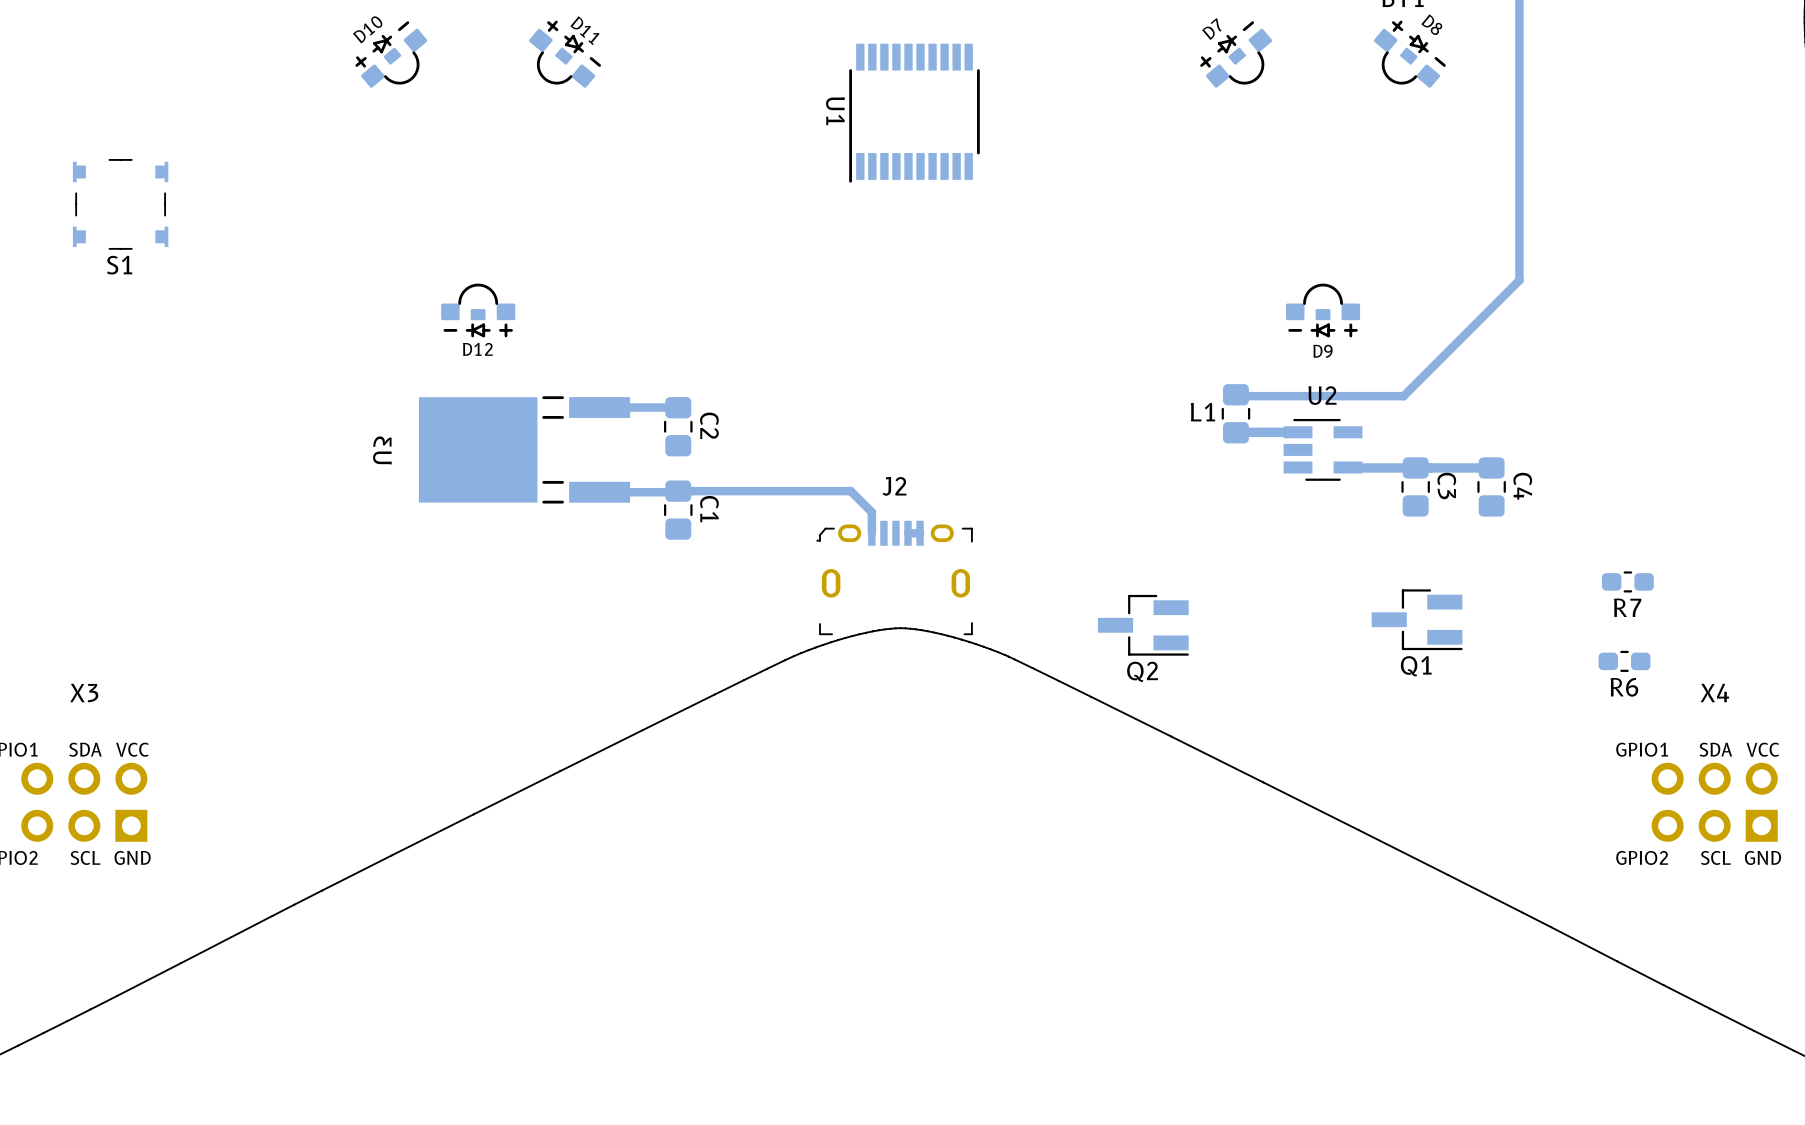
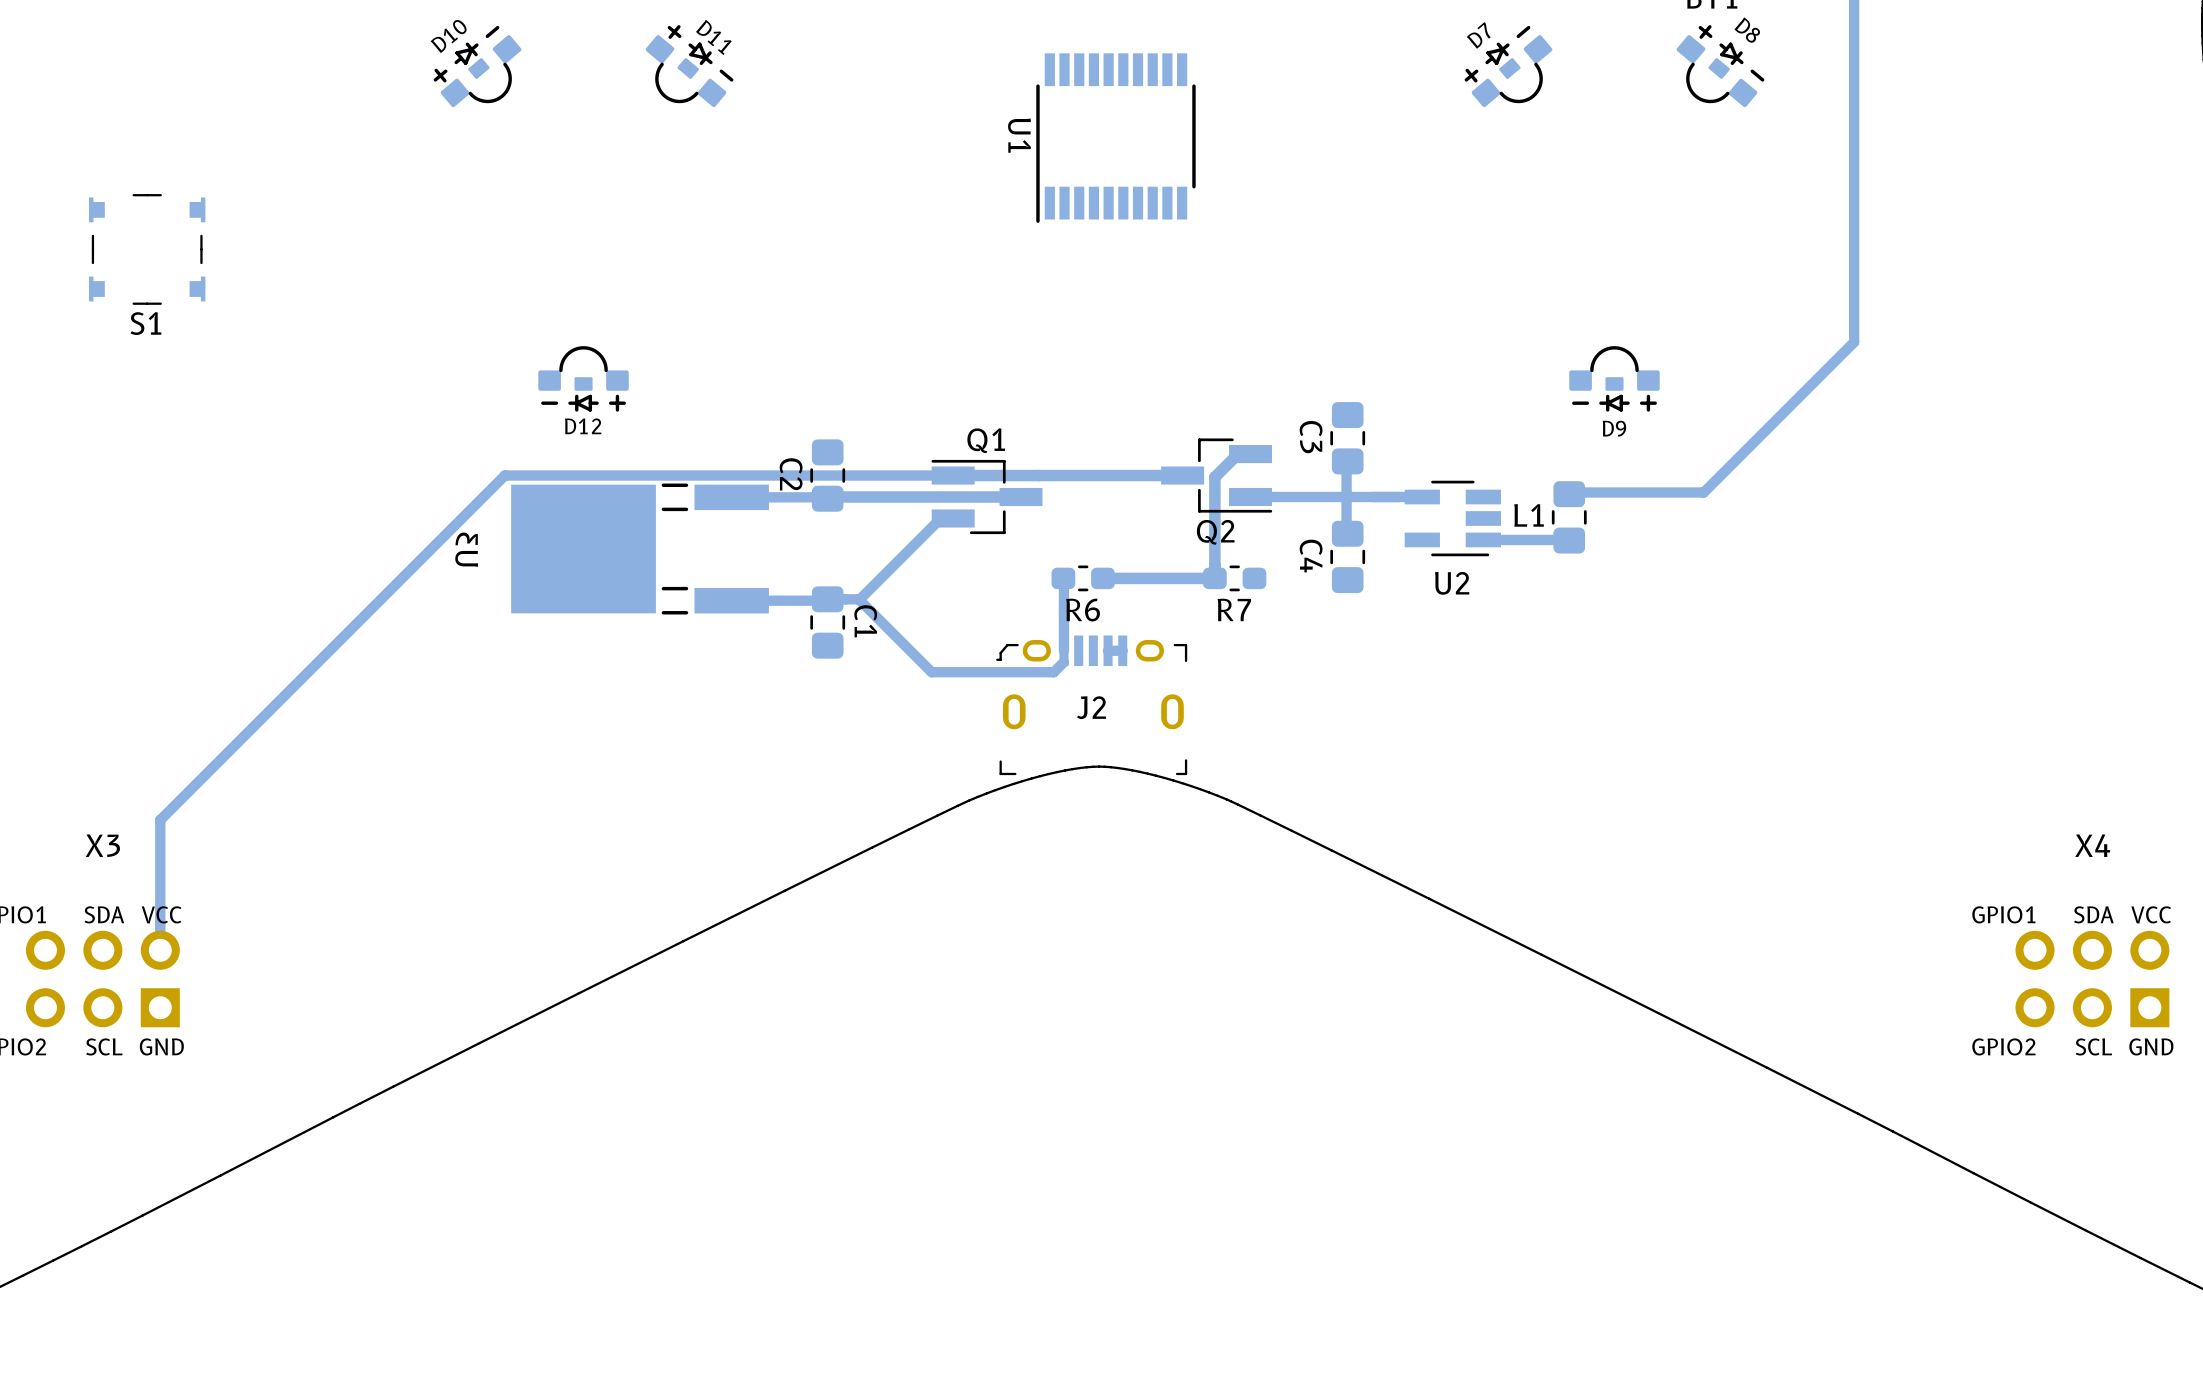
track: none -> (1250, 454) (1238, 454) (1214, 477) (1214, 578) (1102, 578)
track: none -> (1346, 461) (1346, 495)
track: none -> (1182, 475) (504, 475) (160, 820) (160, 950)
track: (1403, 396) (1236, 396) -> (1712, 483) (1703, 492) (1572, 492) (1569, 495)
track: none -> (1347, 495) (1346, 533) (1347, 532)
track: none -> (1021, 497) (829, 497) (827, 498)
track: none -> (1422, 497) (1250, 497)
L1 position: (1235, 413) -> (1569, 517)
C2 name position: C2 (709, 425) -> C2 (791, 474)
C2 position: (678, 426) -> (827, 475)
track: (1234, 431) (1298, 432) -> none
track: none -> (1483, 539) (1569, 540)
U2 rotation: 0° (1323, 449) -> 180° (1452, 518)
U2 position: (1323, 449) -> (1452, 518)
track: (1348, 467) (1491, 467) -> none
track: none -> (1063, 578) (1063, 625)
J2 name position: J2 (894, 486) -> J2 (1091, 707)
C3 position: (1415, 486) -> (1347, 438)
C3 name position: C3 (1446, 486) -> C3 (1311, 437)
C4 position: (1491, 486) -> (1347, 556)
C4 name position: C4 (1522, 486) -> C4 (1311, 556)
track: none -> (858, 599) (931, 672) (1053, 672) (1063, 662)
track: (704, 491) (850, 491) (871, 512) -> (859, 599) (940, 518) (953, 518)
R7 position: (1627, 581) -> (1234, 578)
Q1 rotation: 0° (1417, 619) -> 180° (986, 497)
Q1 position: (1417, 619) -> (986, 497)
Q2 position: (1143, 625) -> (1216, 475)
R6 position: (1624, 661) -> (1083, 578)

